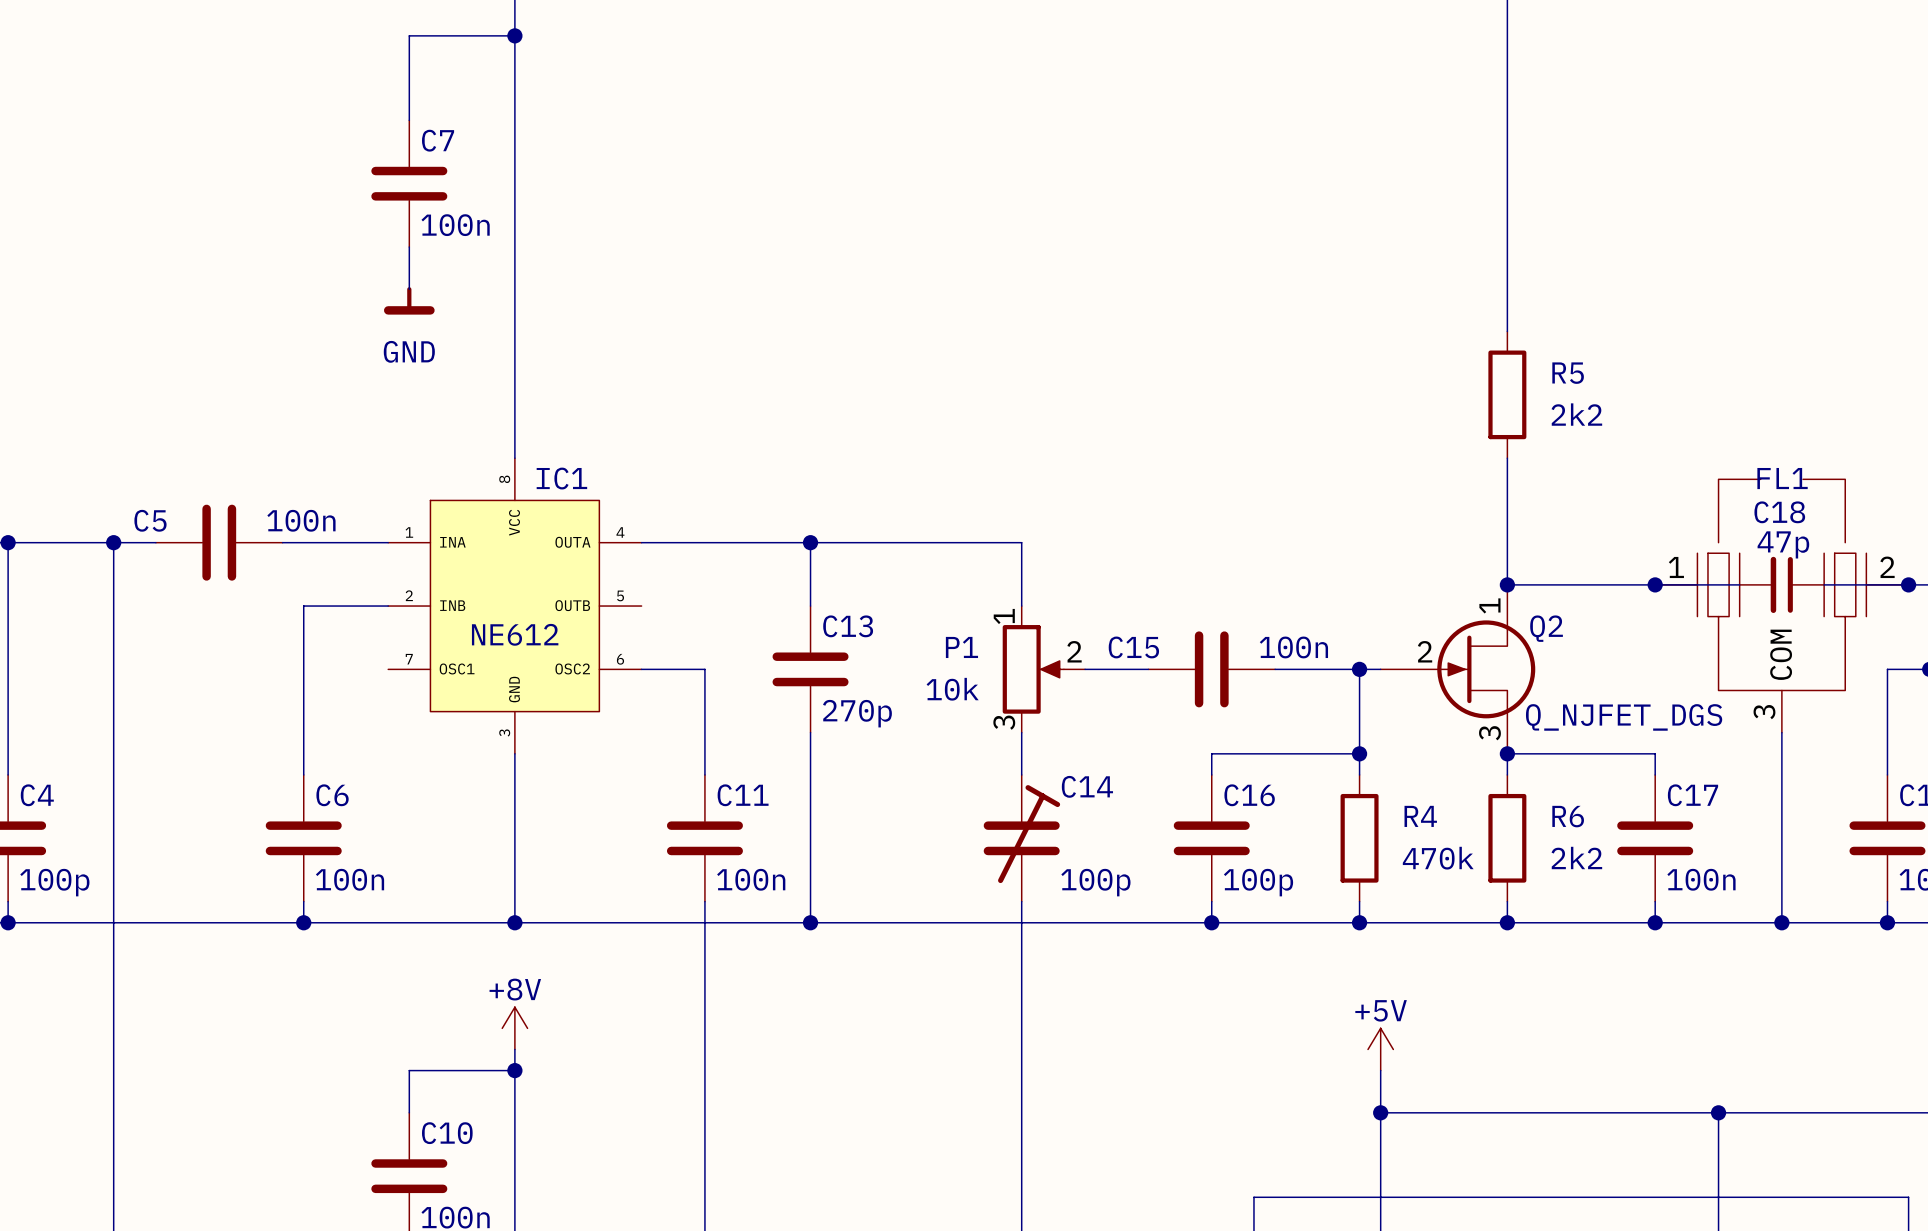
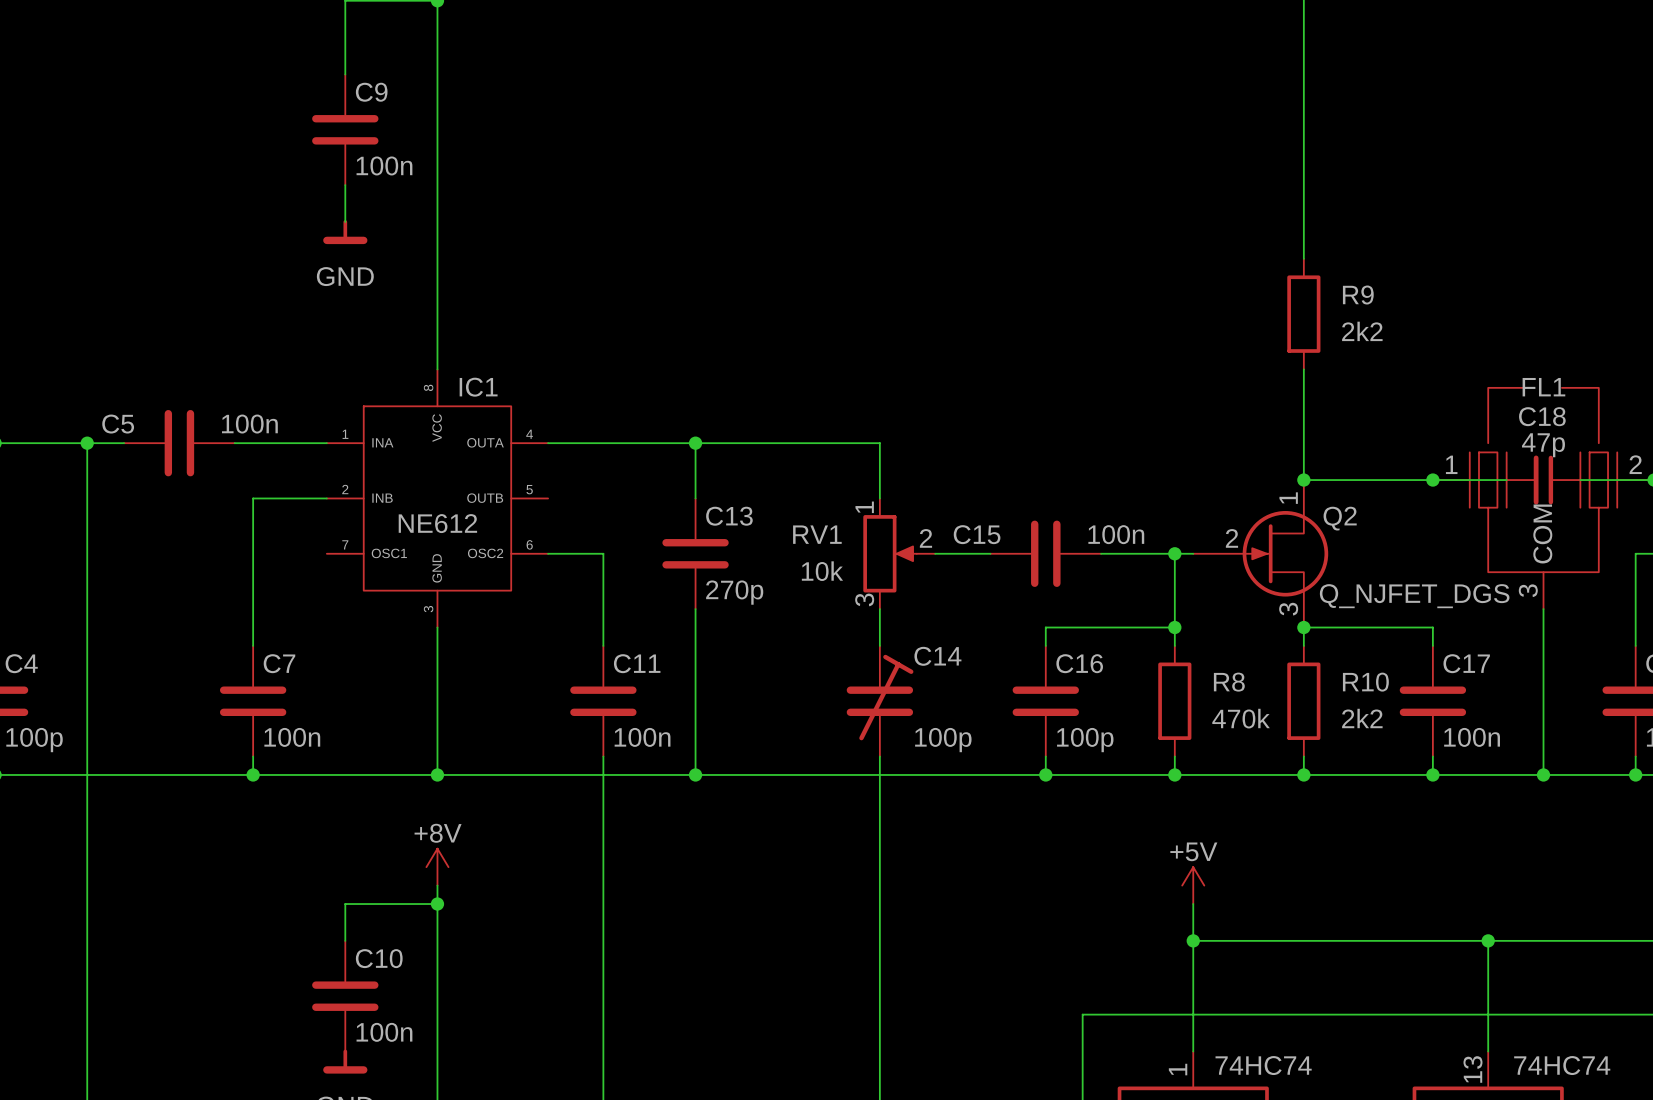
C7 name: C7 (438, 140) -> C9 (371, 92)
R5 name: R5 (1568, 373) -> R9 (1358, 295)
P1 name: P1 (961, 647) -> RV1 (817, 534)
C6 name: C6 (332, 795) -> C7 (279, 663)
R4 name: R4 (1420, 816) -> R8 (1229, 682)
R6 name: R6 (1568, 816) -> R10 (1365, 682)

